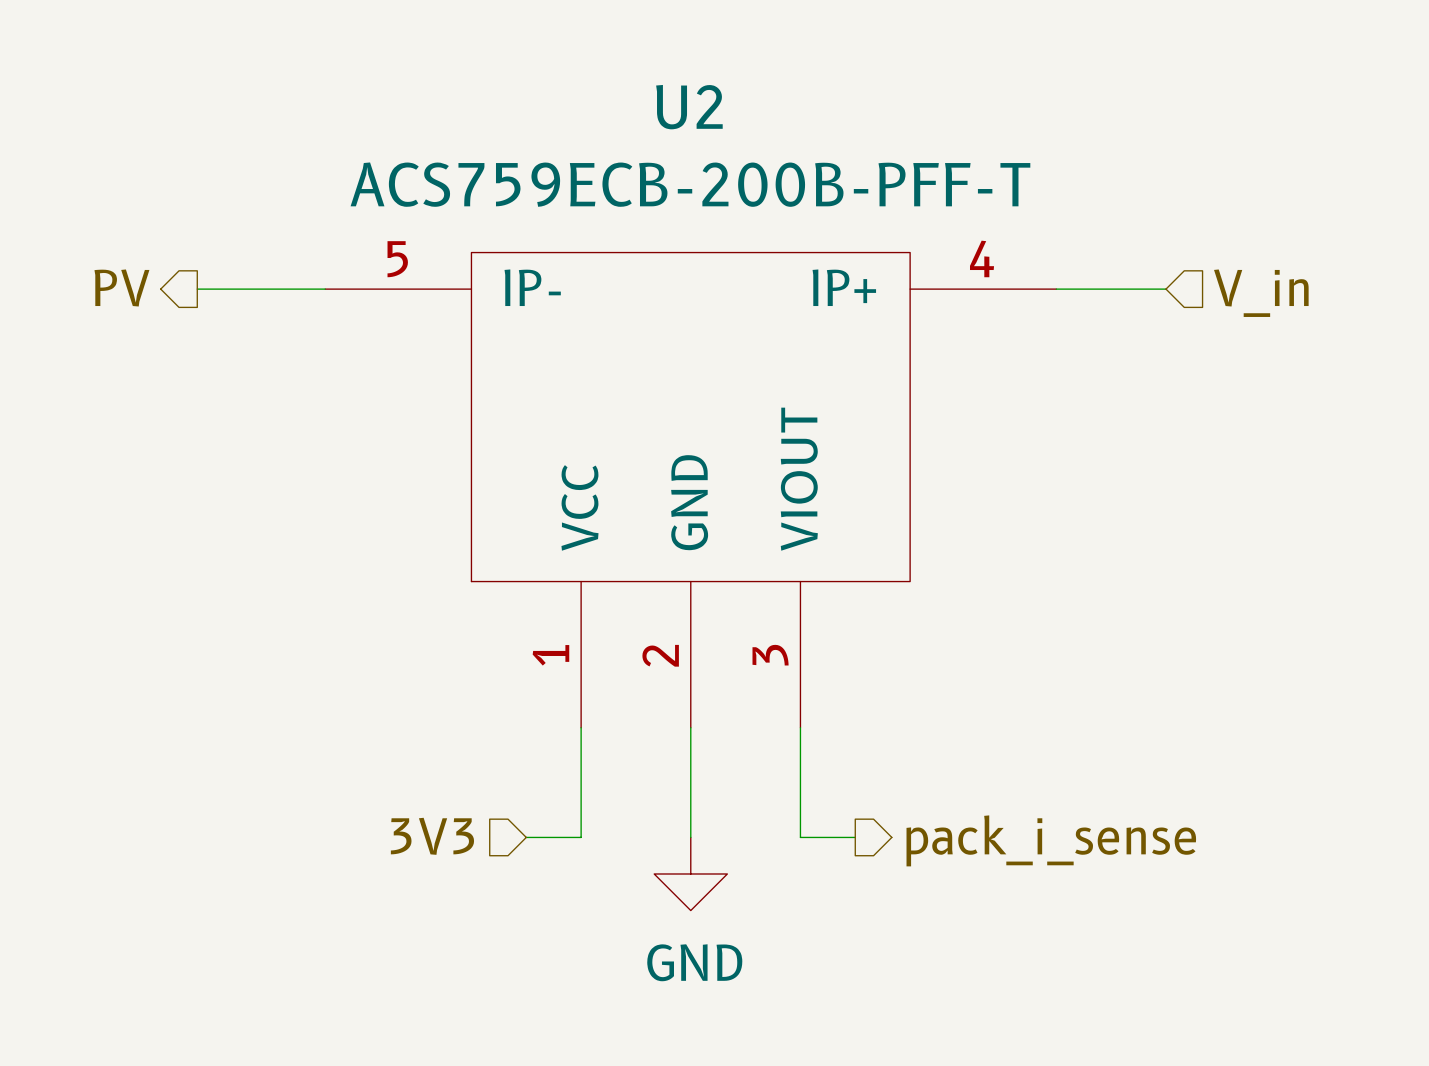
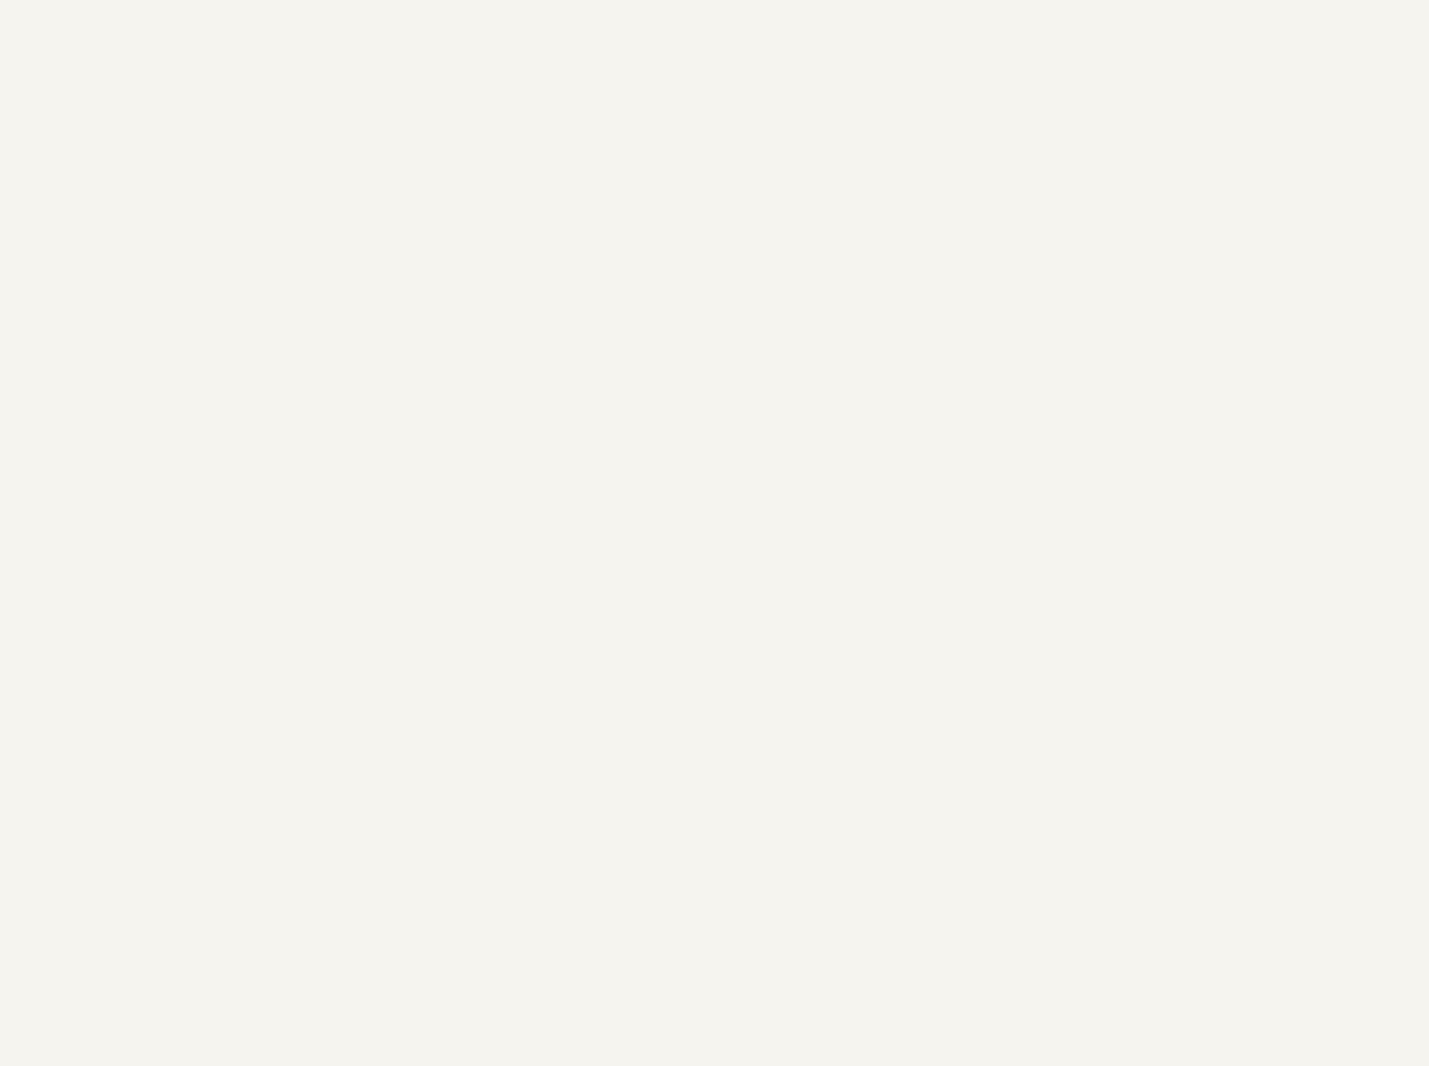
hierarchical label: PV (121, 287) -> none
wire: (197, 289) (325, 289) -> none
wire: (1056, 289) (1166, 289) -> none
hierarchical label: V_in (1261, 293) -> none
U2: ACS759ECB-200B-PFF-T (690, 490) -> none
wire: (581, 727) (581, 837) (526, 837) -> none
wire: (690, 727) (690, 837) -> none
wire: (800, 727) (800, 837) (855, 837) -> none
hierarchical label: 3V3 (432, 836) -> none
hierarchical label: pack_i_sense (1051, 840) -> none
power symbol: GND (690, 873) -> none

